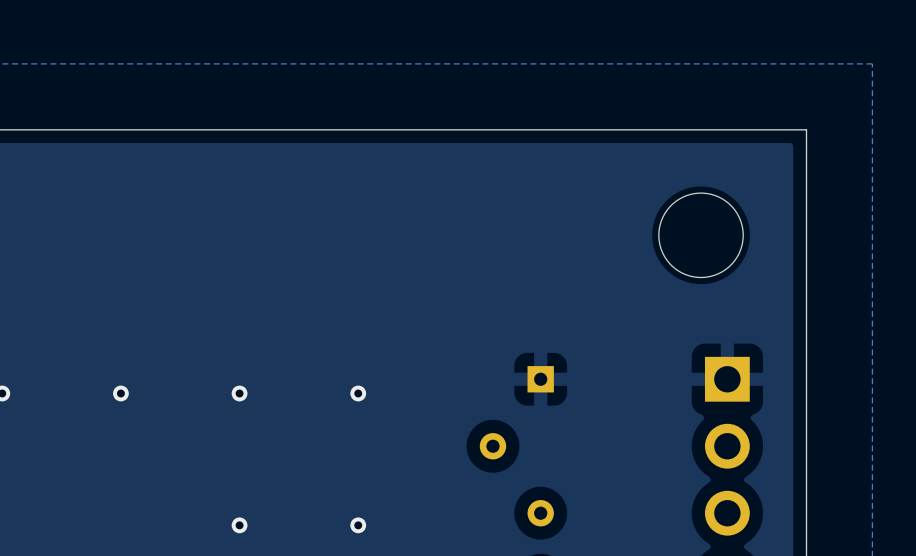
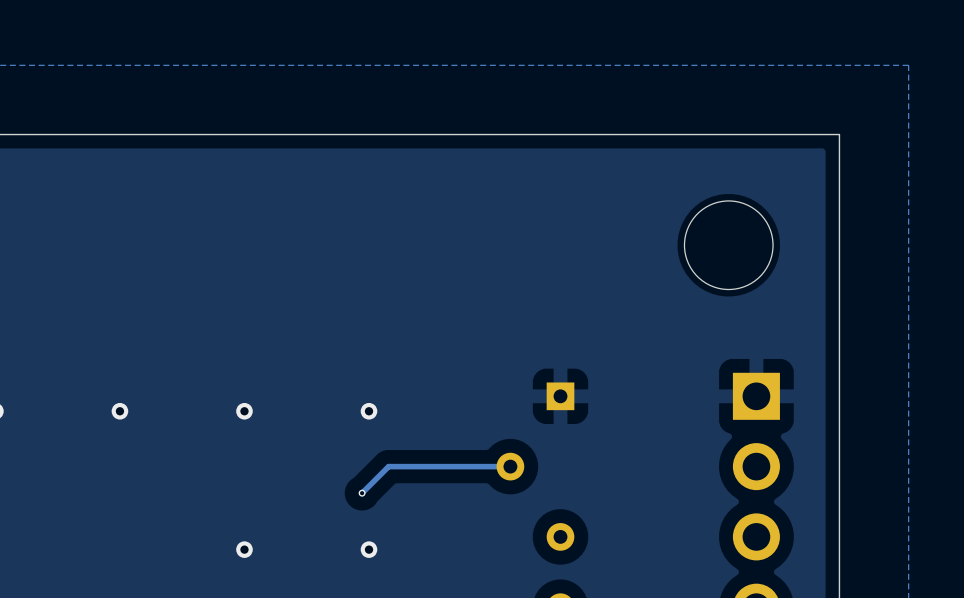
track: none -> (510, 466) (388, 466) (362, 493)
via: none -> (362, 493)

